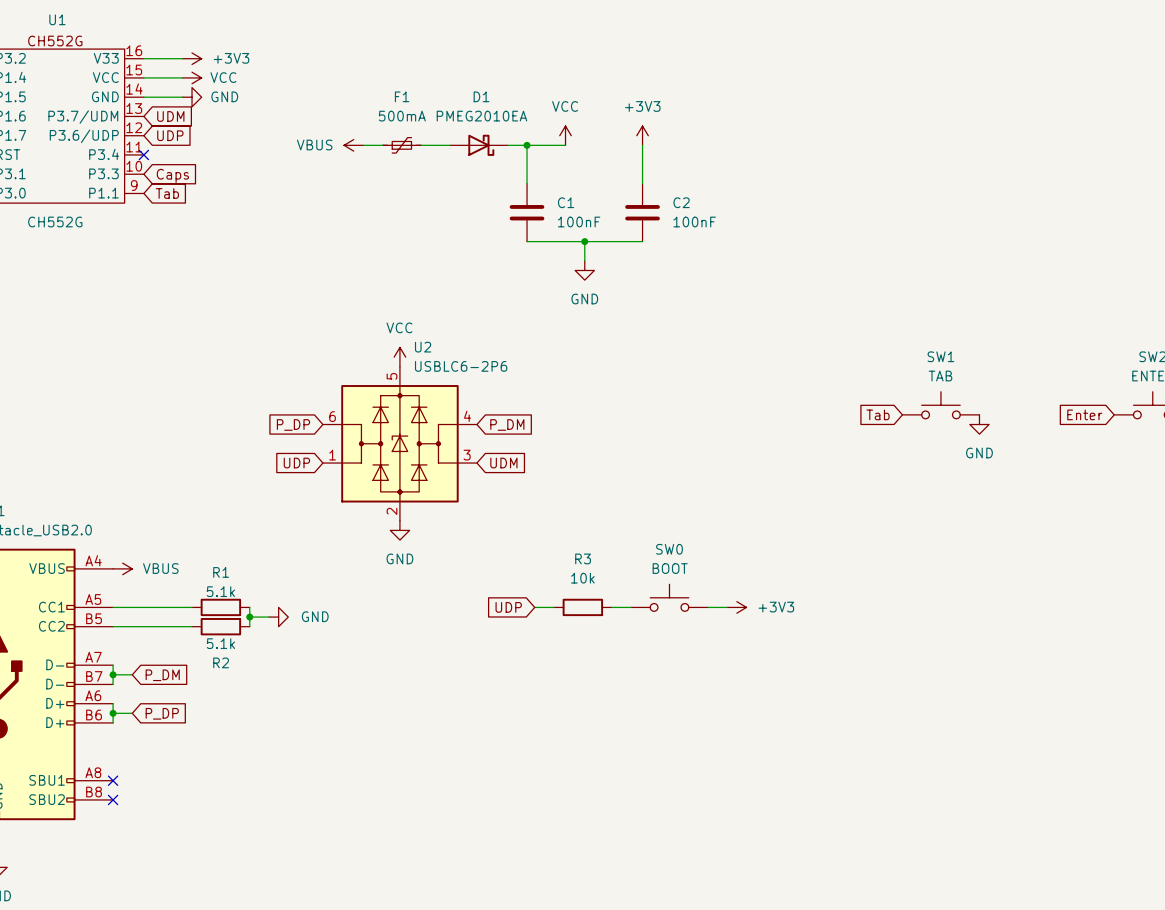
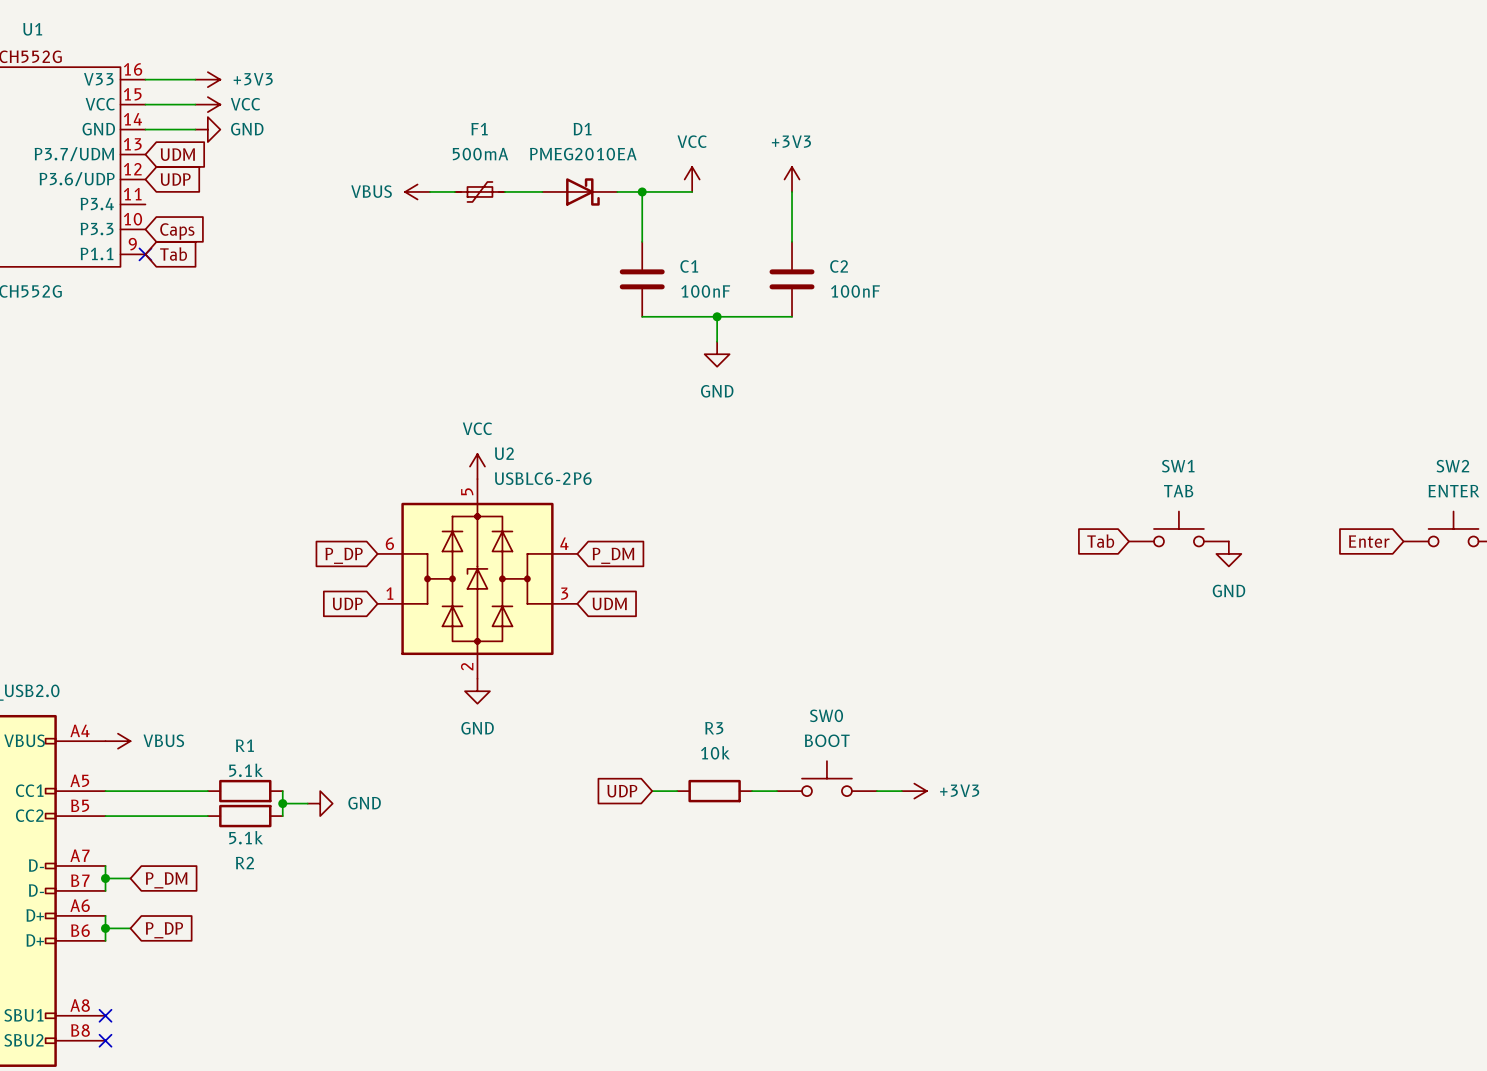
no-connect mark position: (143, 154) -> (145, 254)

